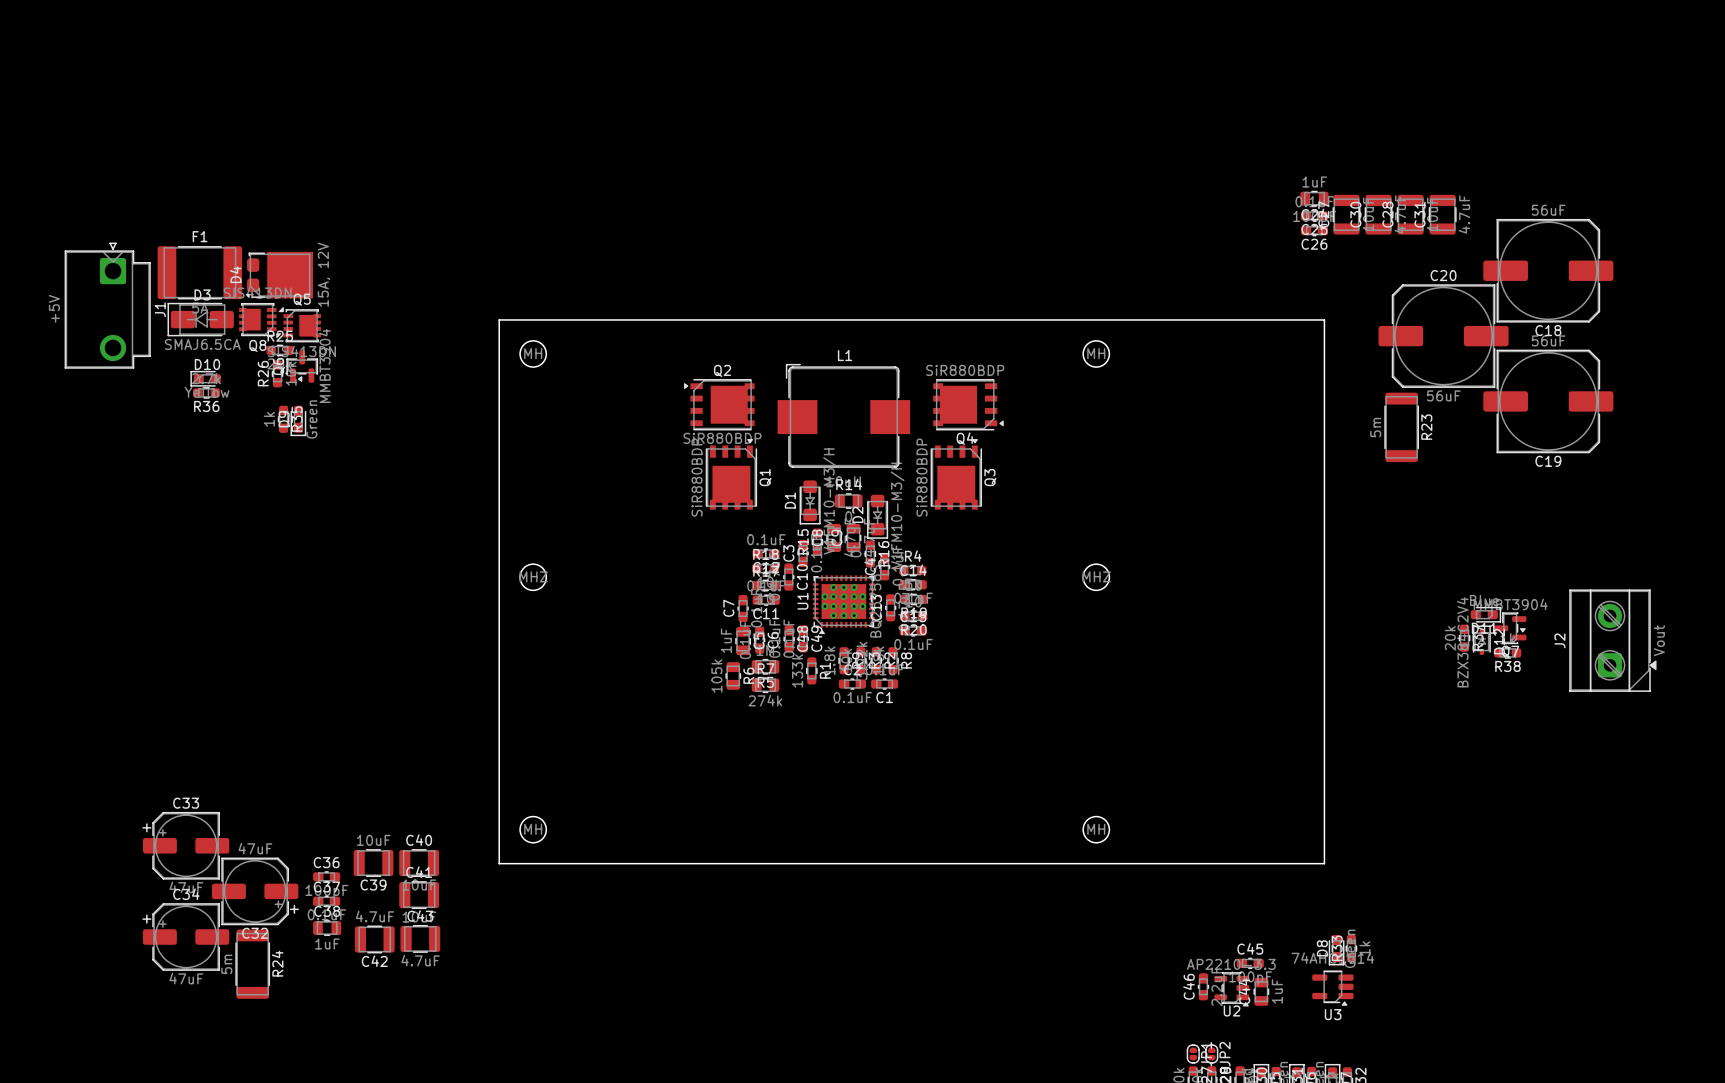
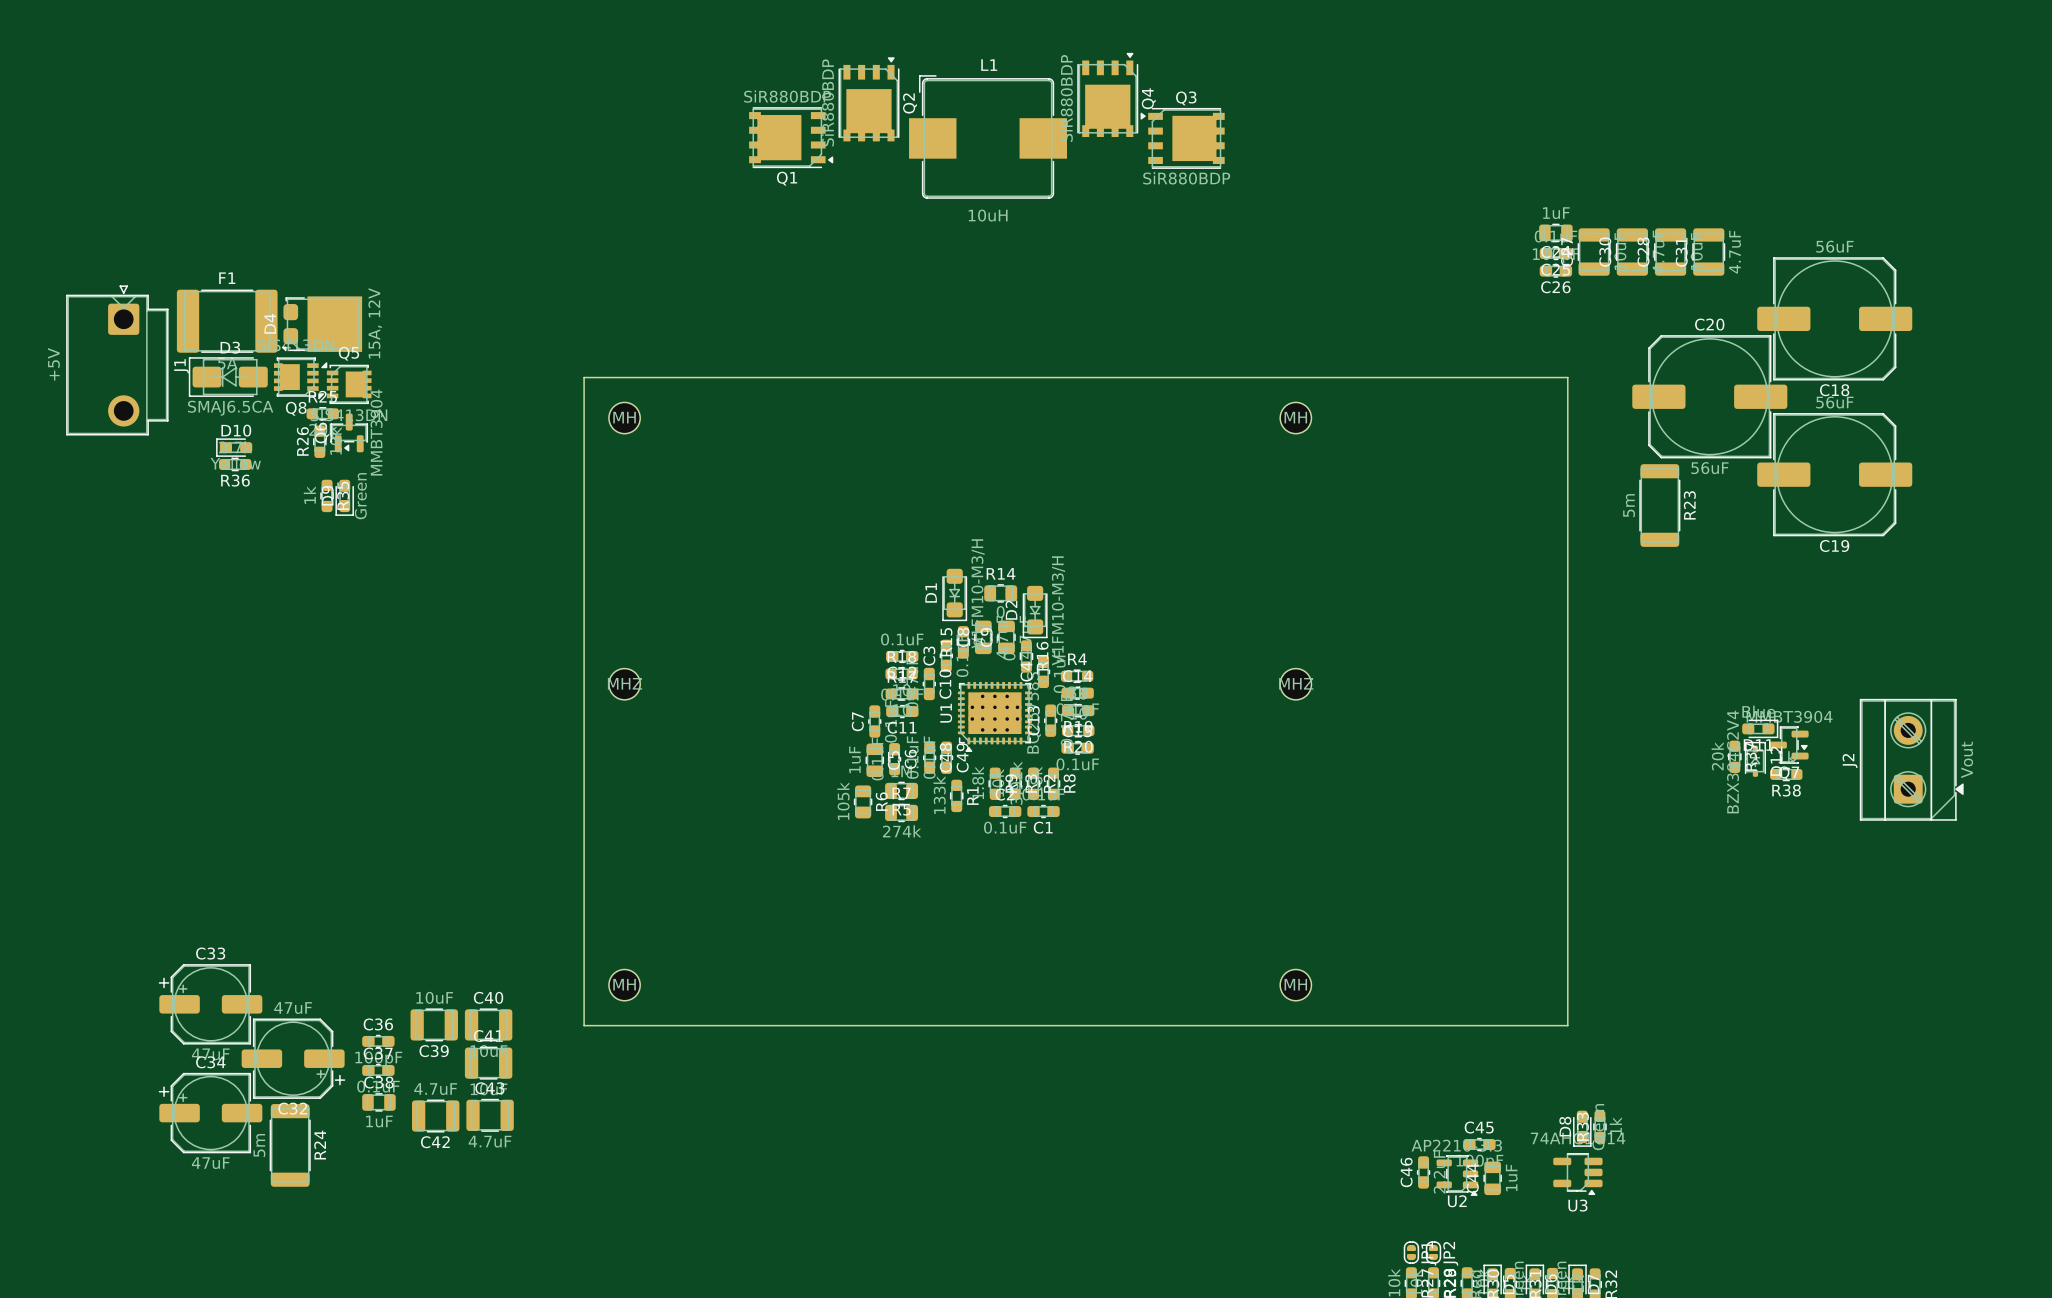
Q2 rotation: 0° (719, 404) -> 90° clockwise (868, 99)
Q2 position: (719, 404) -> (868, 99)
Q4 rotation: 0° (968, 404) -> 90° counterclockwise (1107, 94)
Q4 position: (968, 404) -> (1107, 94)
L1 position: (843, 415) -> (988, 136)
Q1 rotation: 0° (731, 474) -> 90° clockwise (791, 137)
Q1 position: (731, 474) -> (791, 137)
Q3 rotation: 0° (956, 474) -> 90° counterclockwise (1182, 138)
Q3 position: (956, 474) -> (1182, 138)

